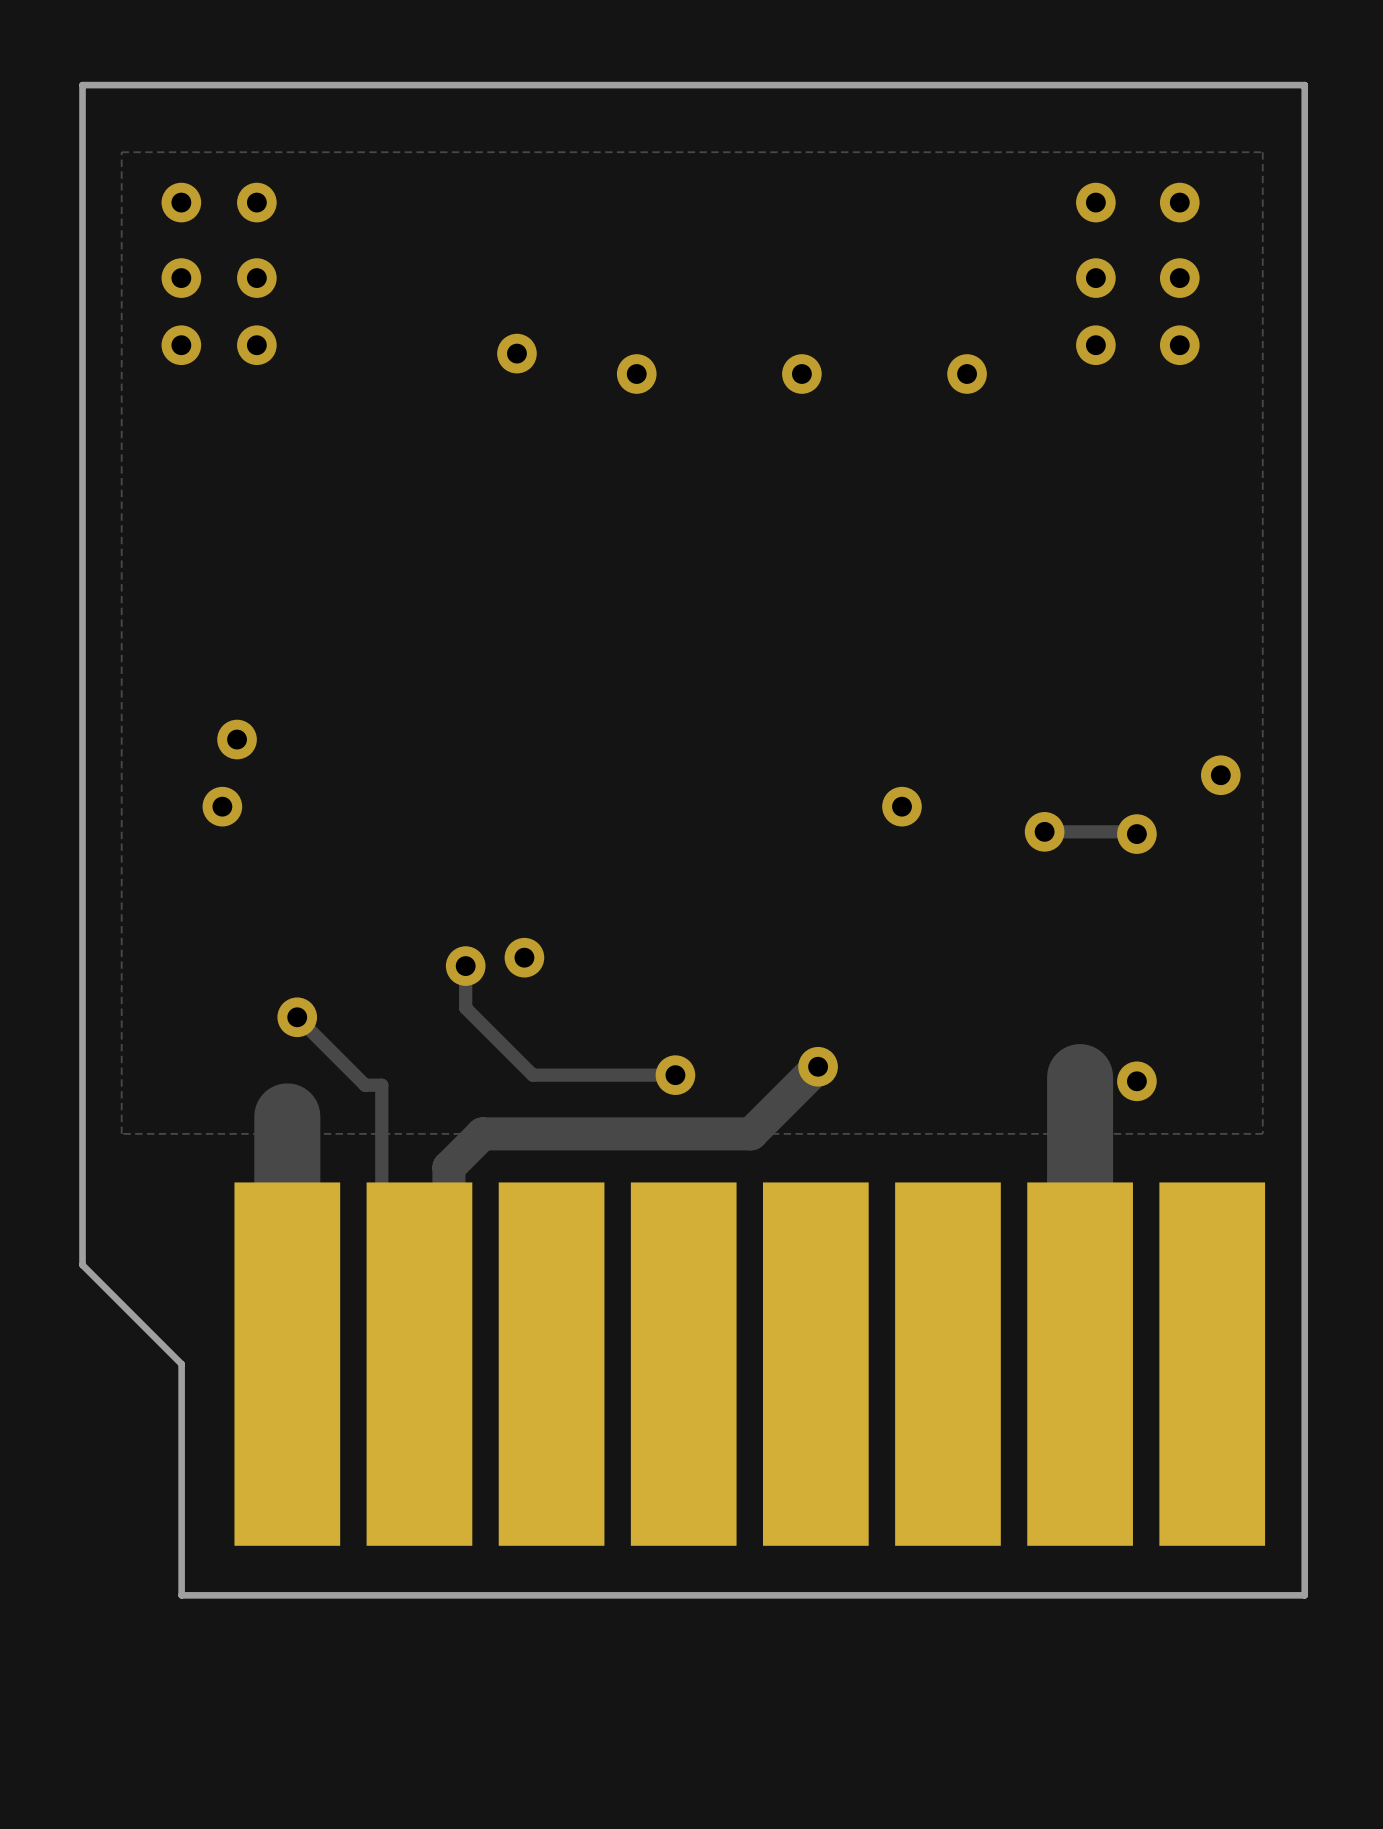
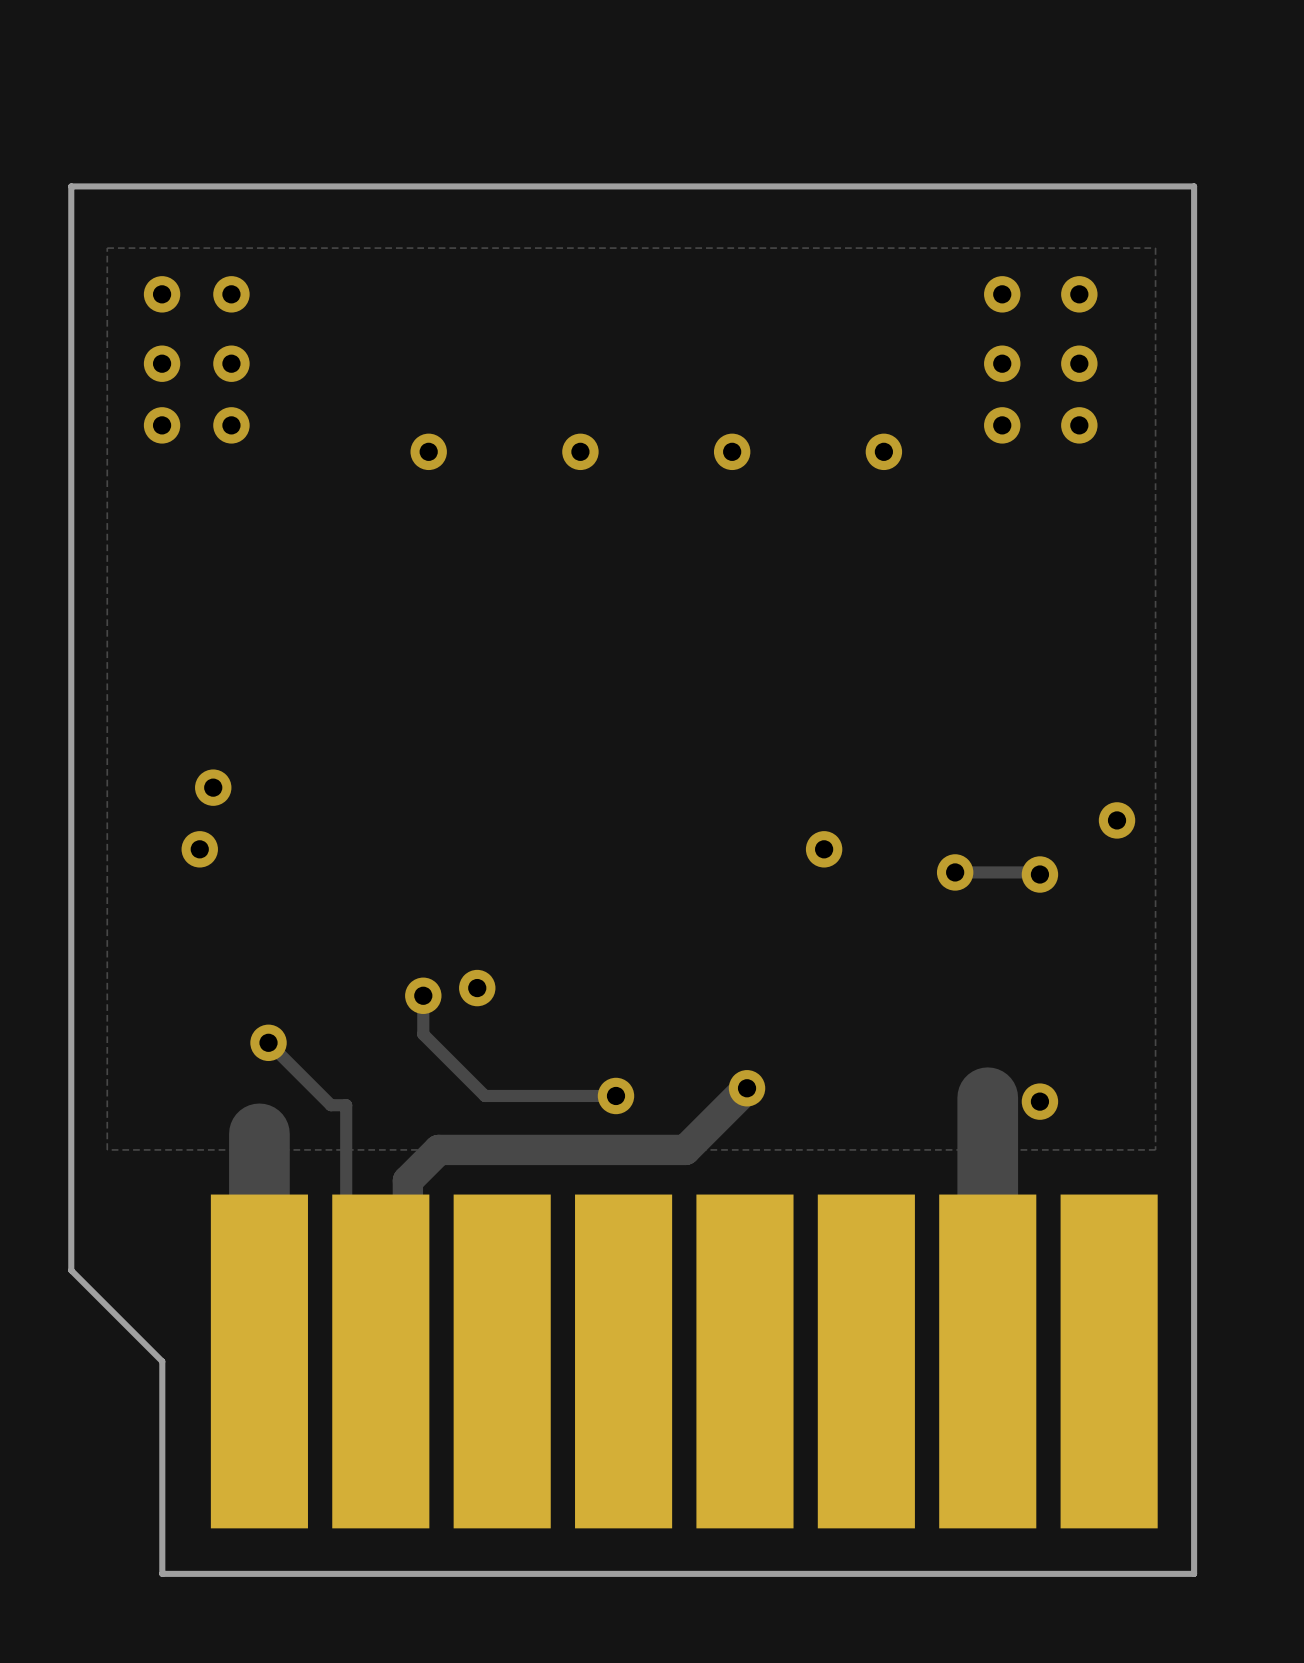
via position: (516, 353) -> (428, 451)

